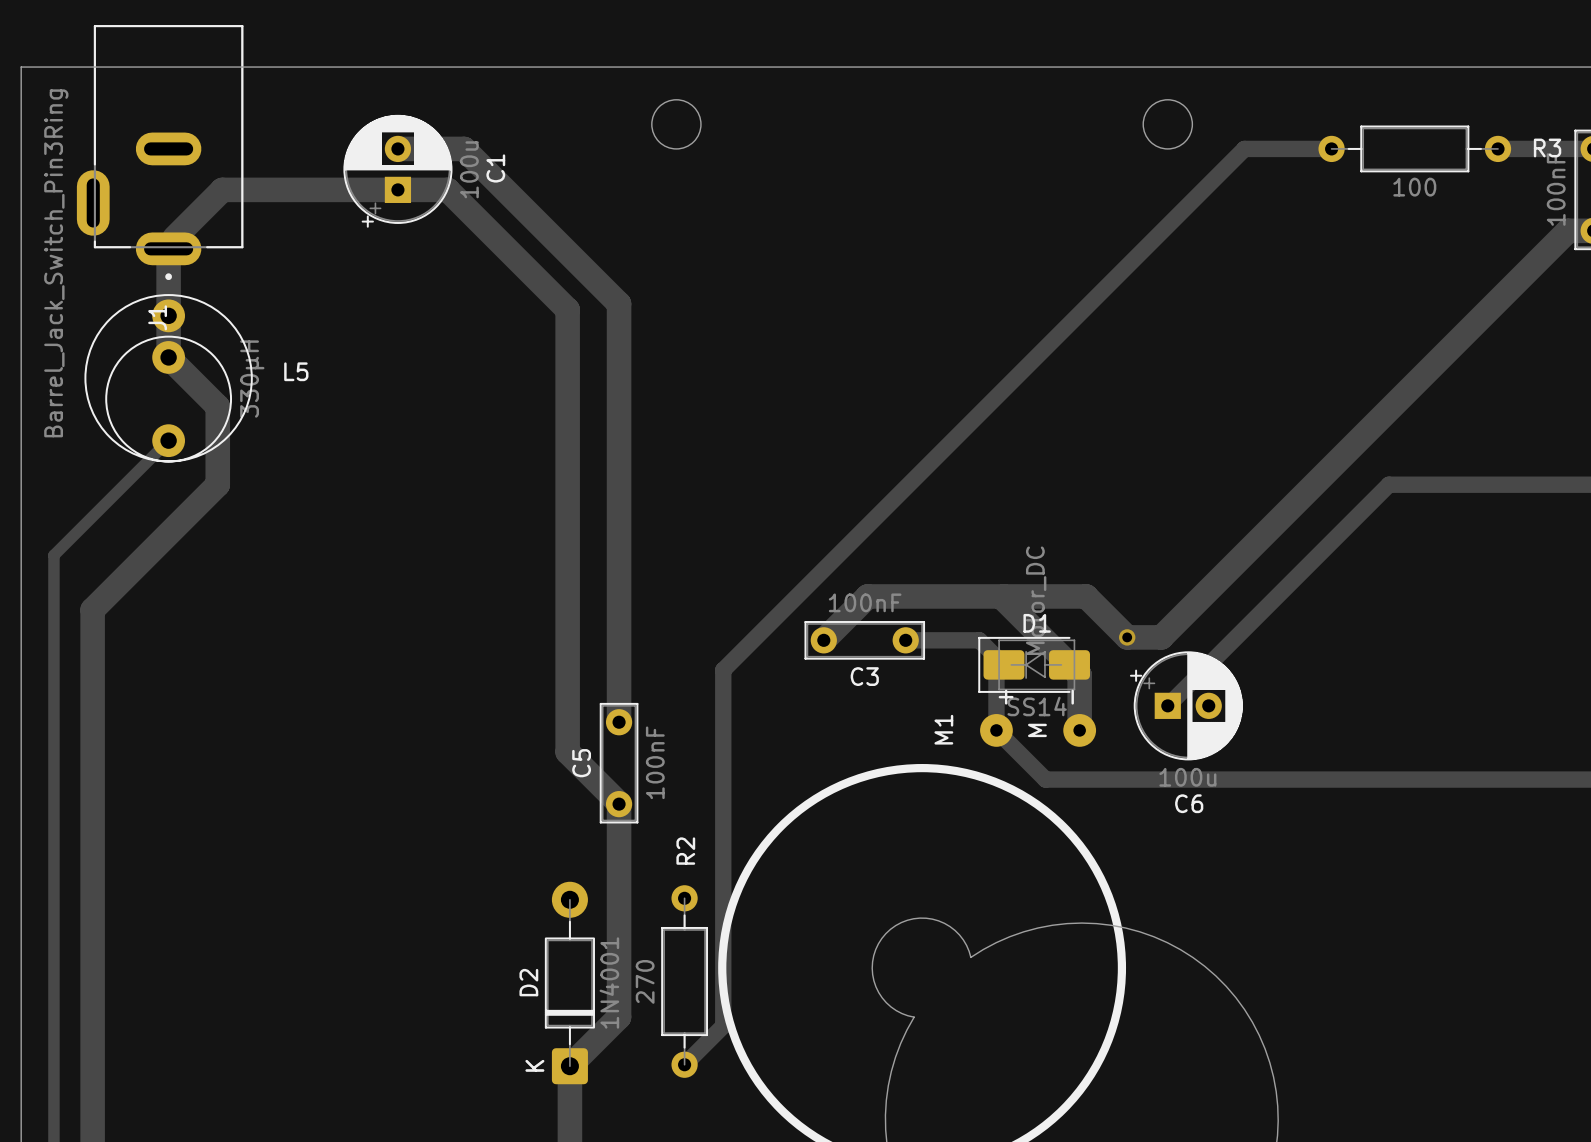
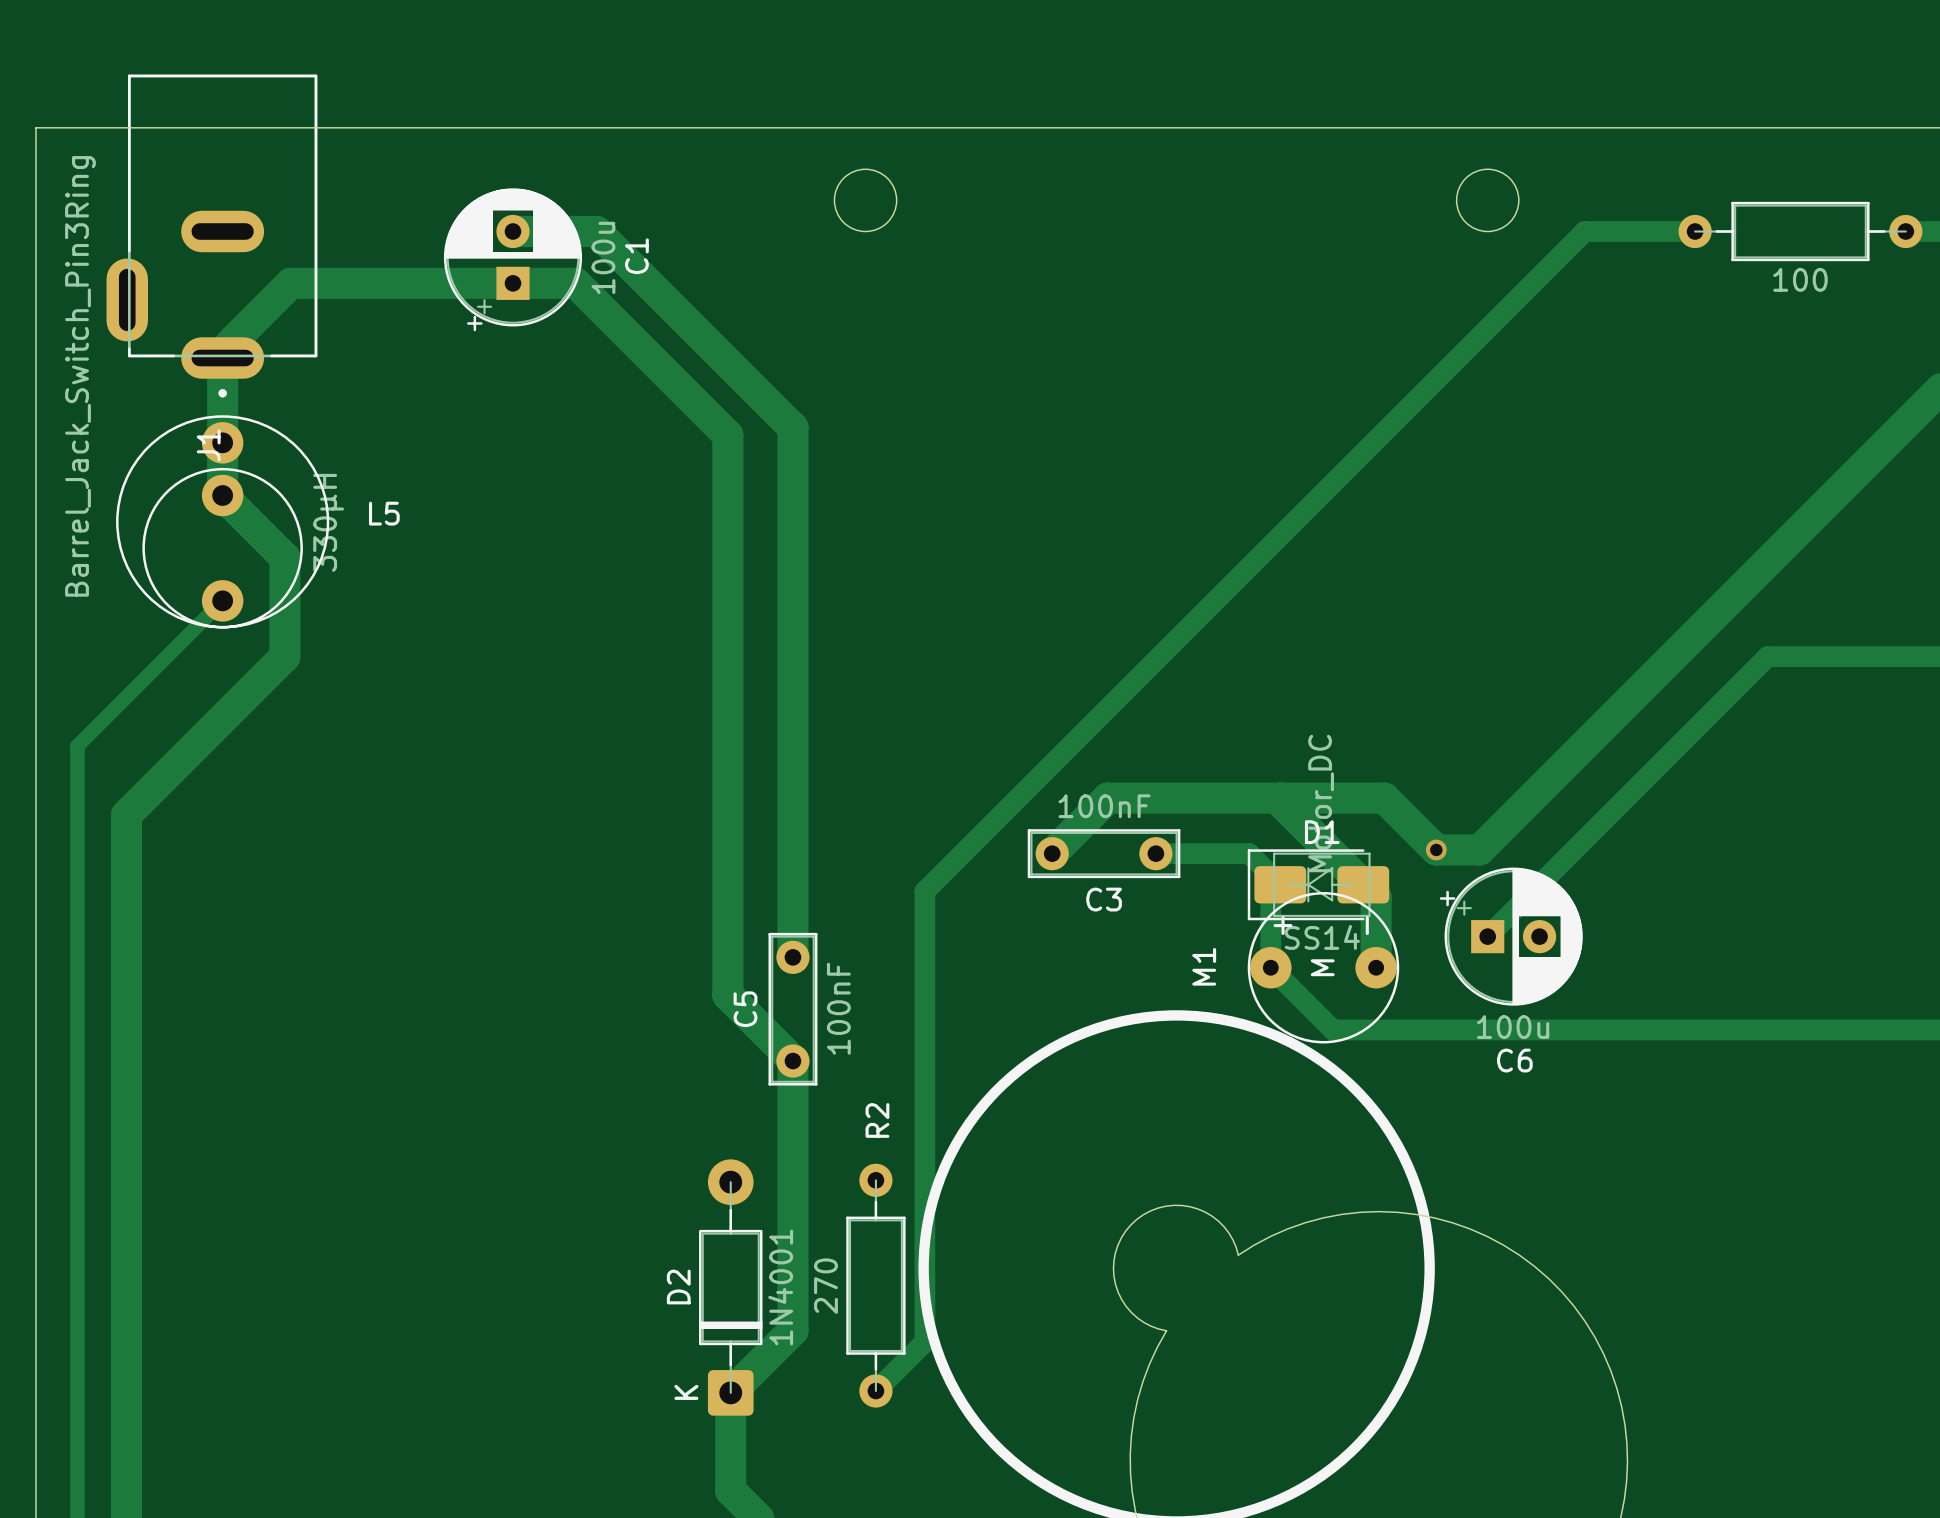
M1 footprint: [980, 714, 1097, 747] -> [1247, 891, 1400, 1044]

